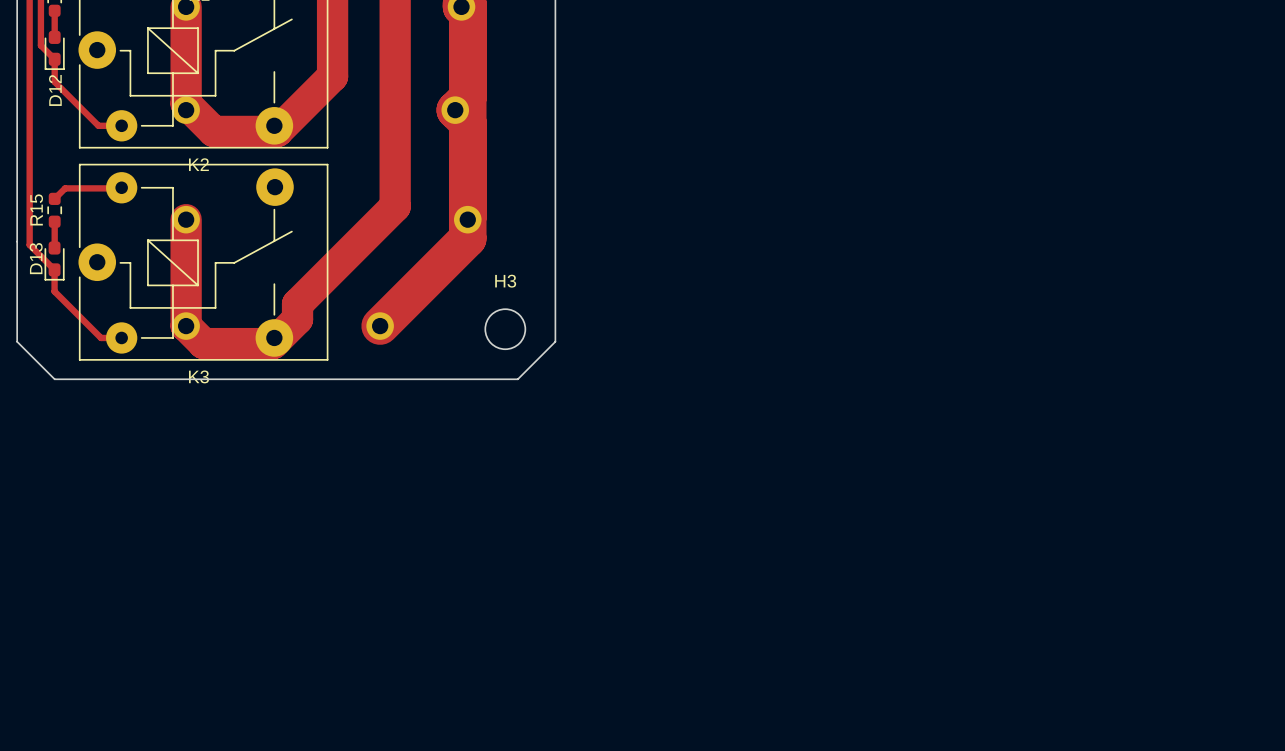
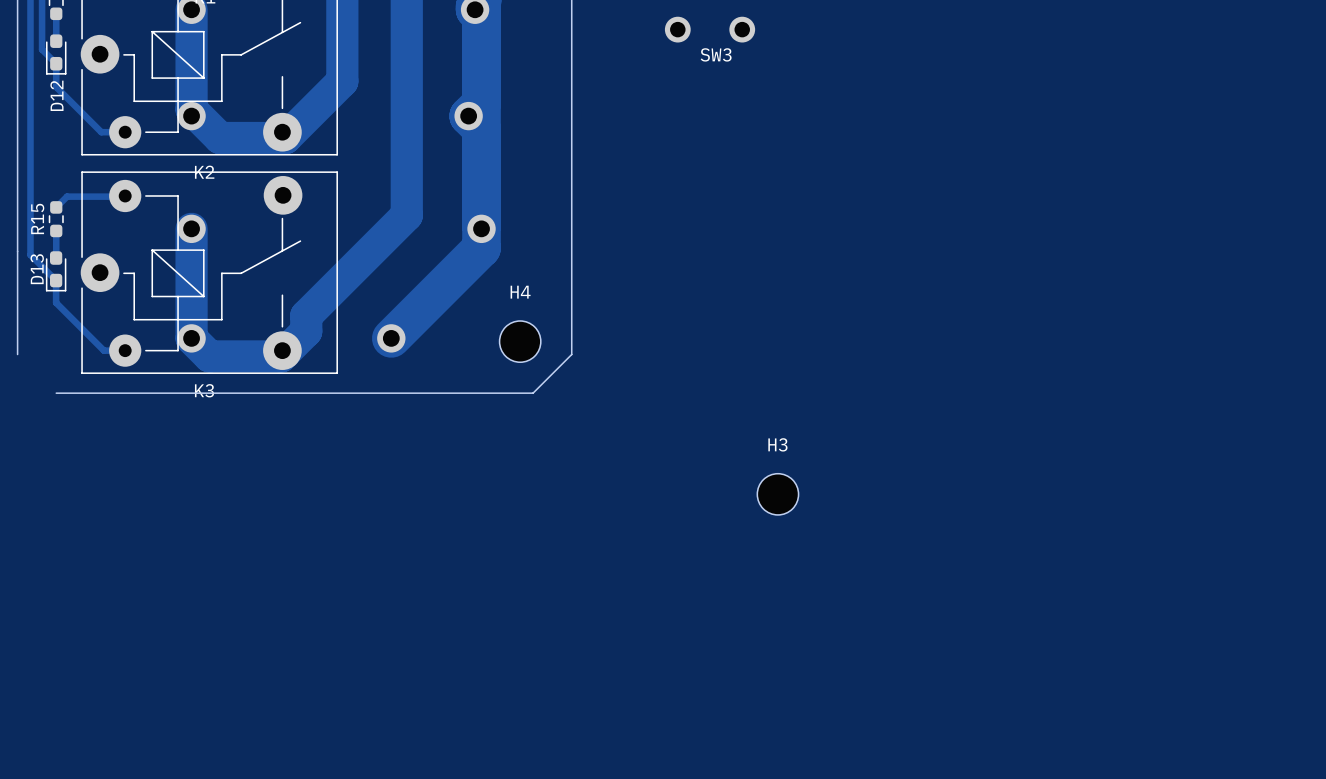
SW3: none -> (710, 29)
H3 name: H3 (505, 281) -> H4 (520, 292)
board edge: (17, 341) (54, 379) -> none
H3: none -> (777, 494)

